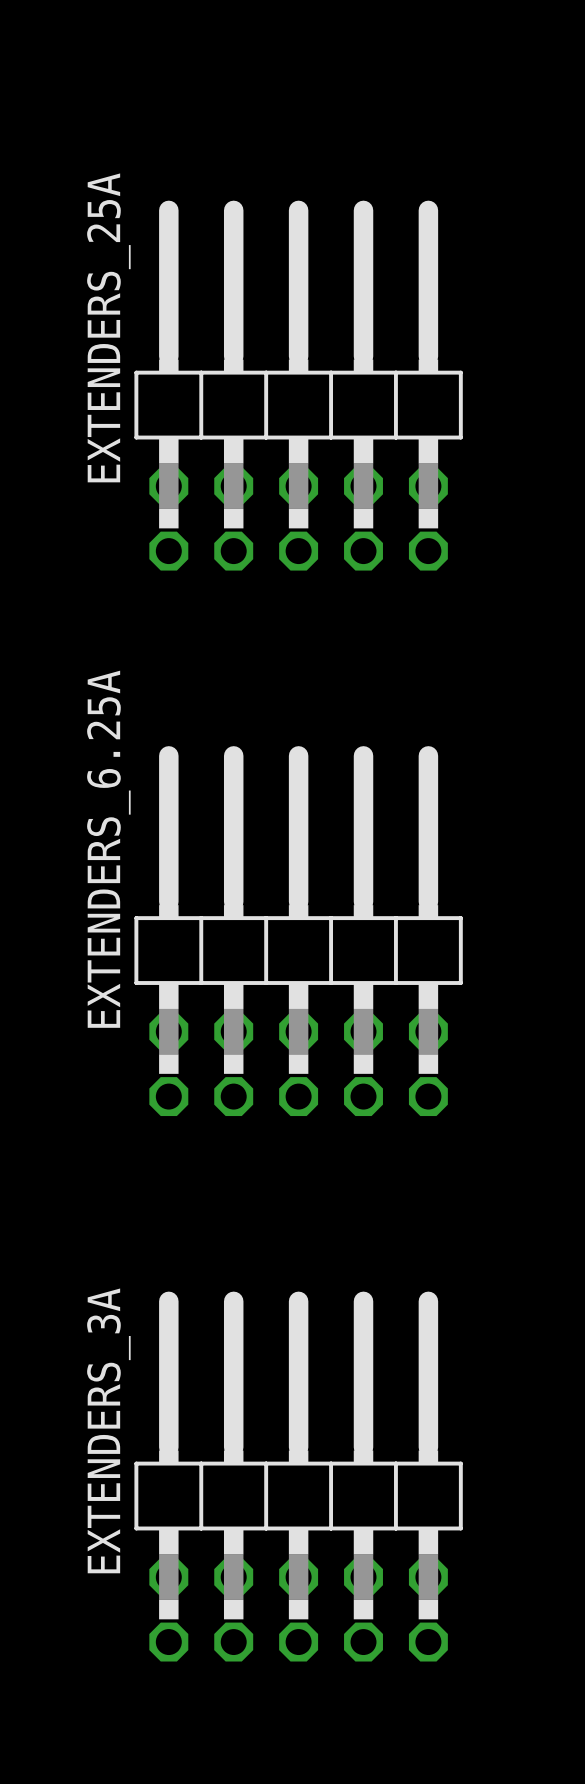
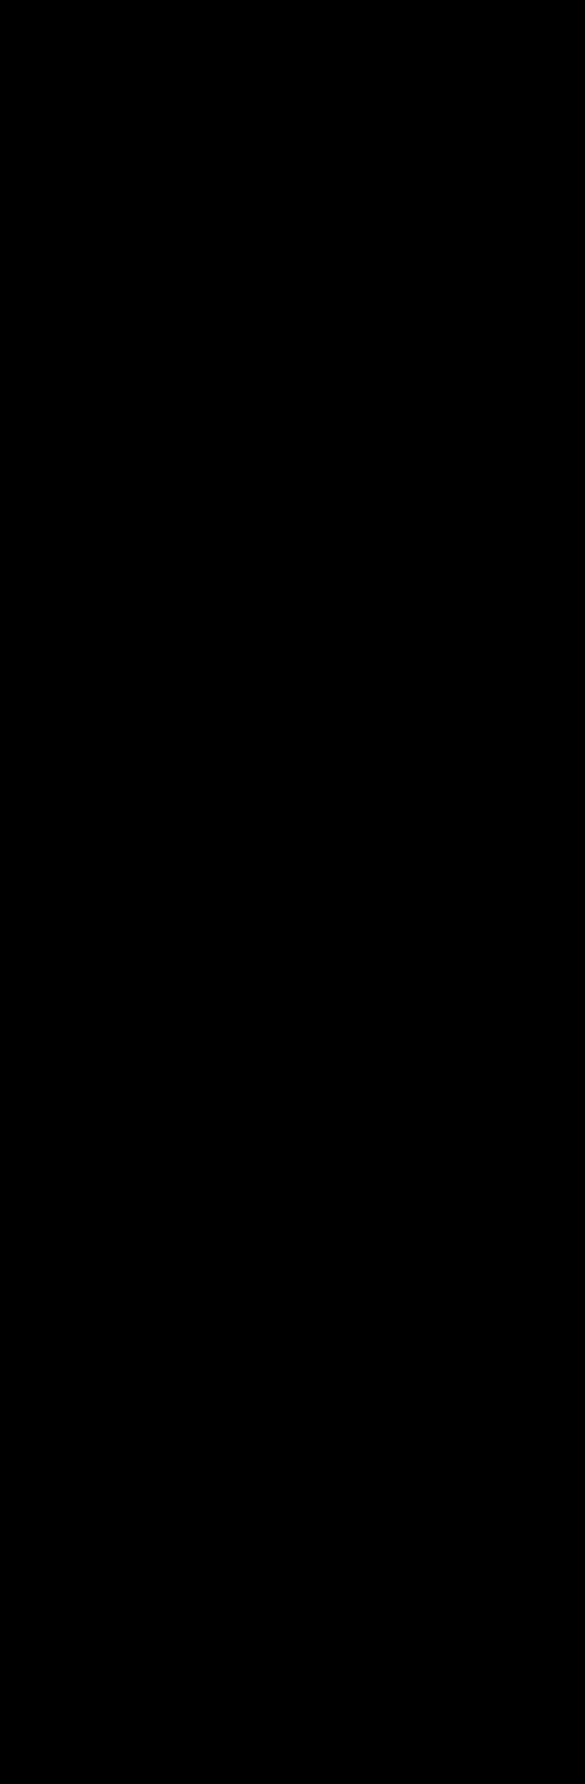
EXTENDERS_25A: (298, 385) -> none
EXTENDERS_6.25A: (298, 931) -> none
EXTENDERS_3A: (298, 1476) -> none

